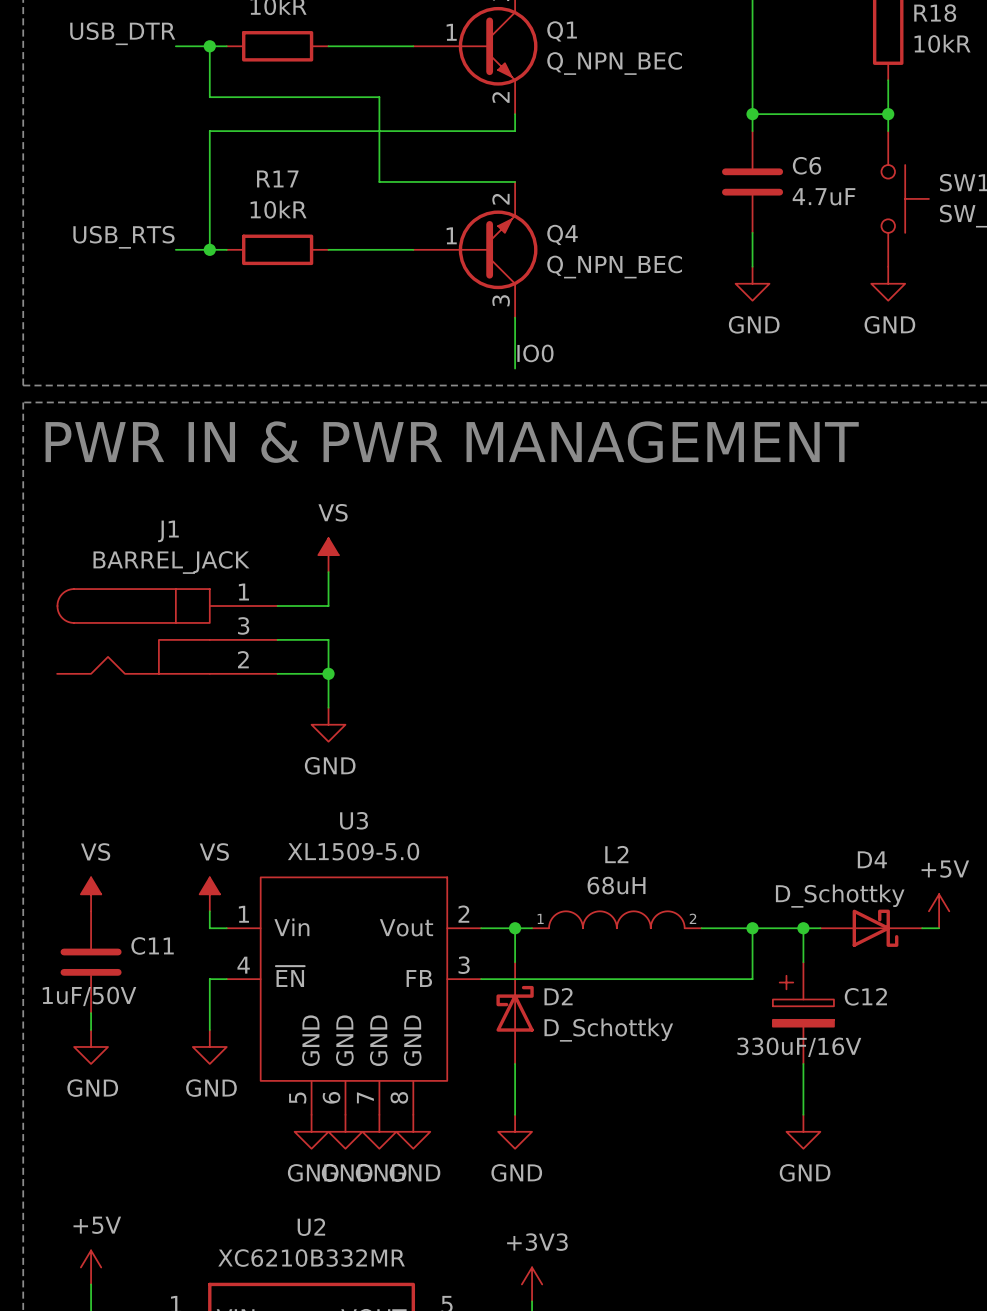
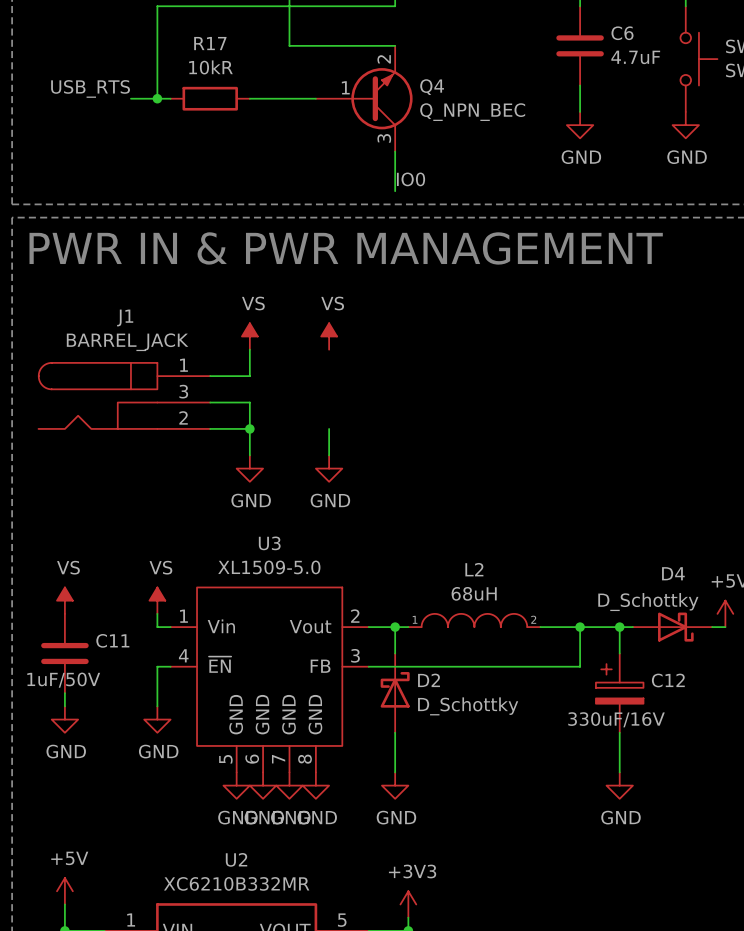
power symbol: none -> VS (329, 336)
wire: none -> (329, 428) (329, 455)
power symbol: none -> GND (329, 468)

